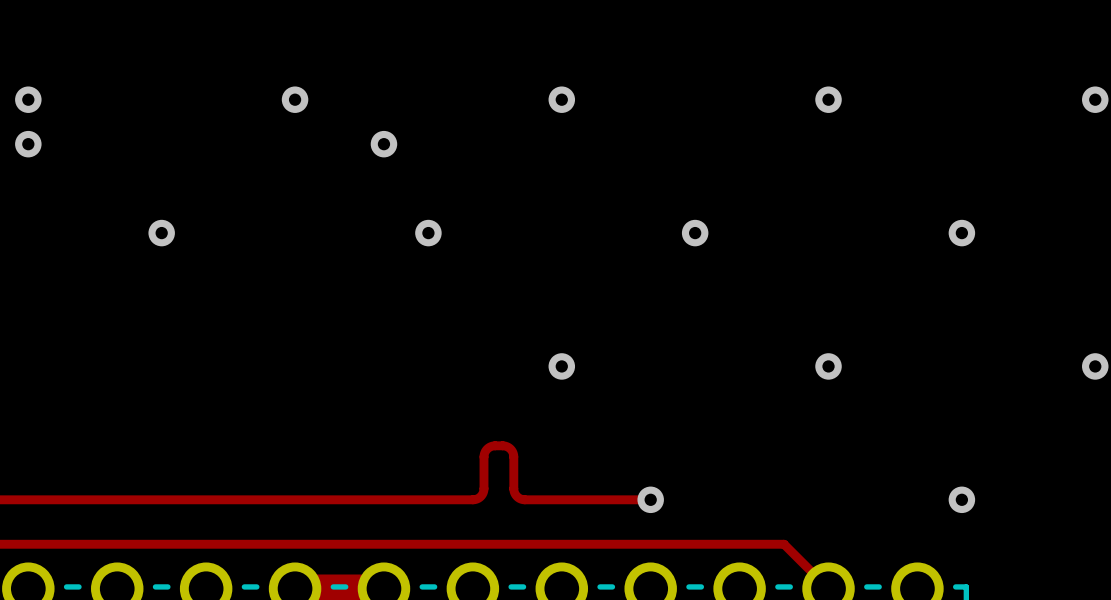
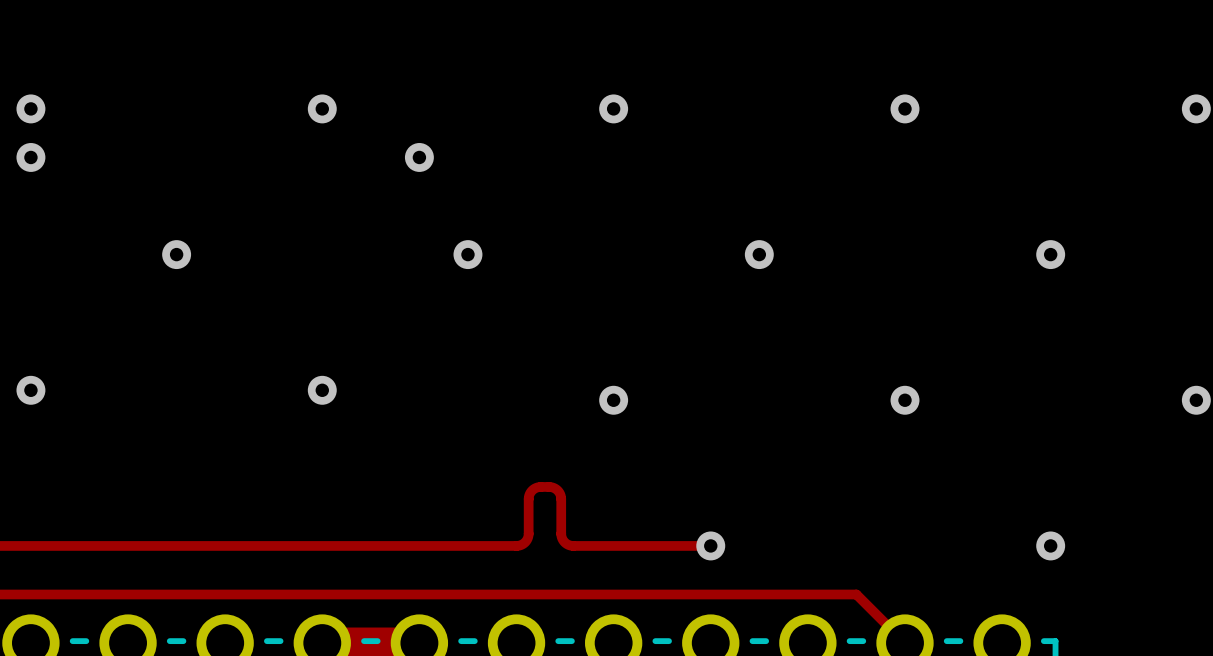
via: none -> (30, 390)
via: none -> (322, 390)

